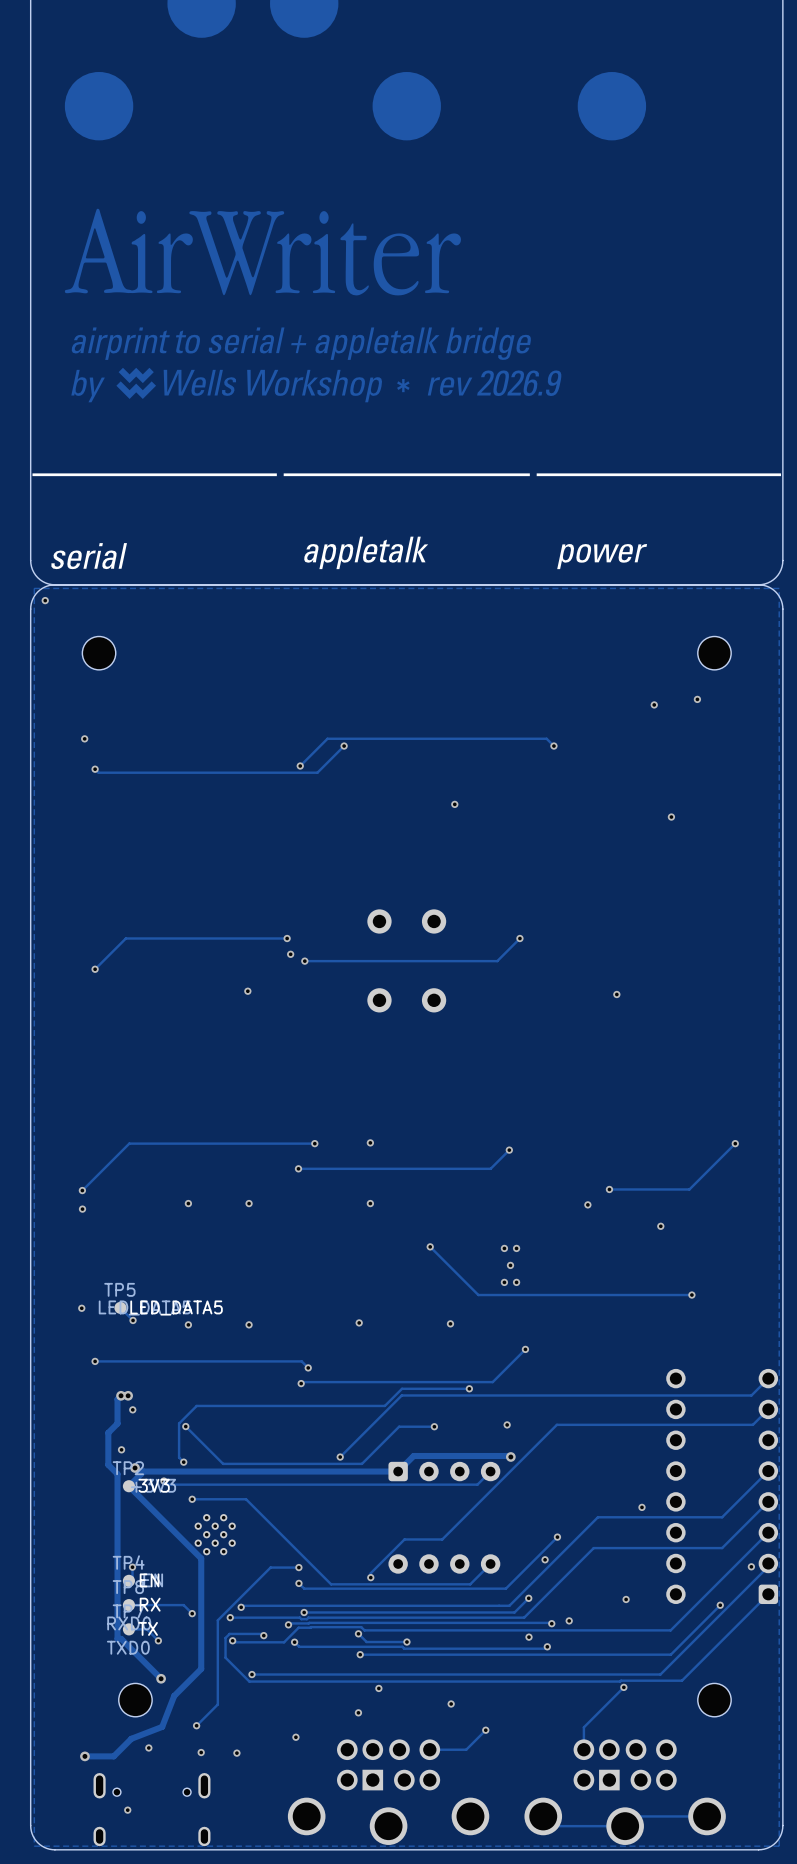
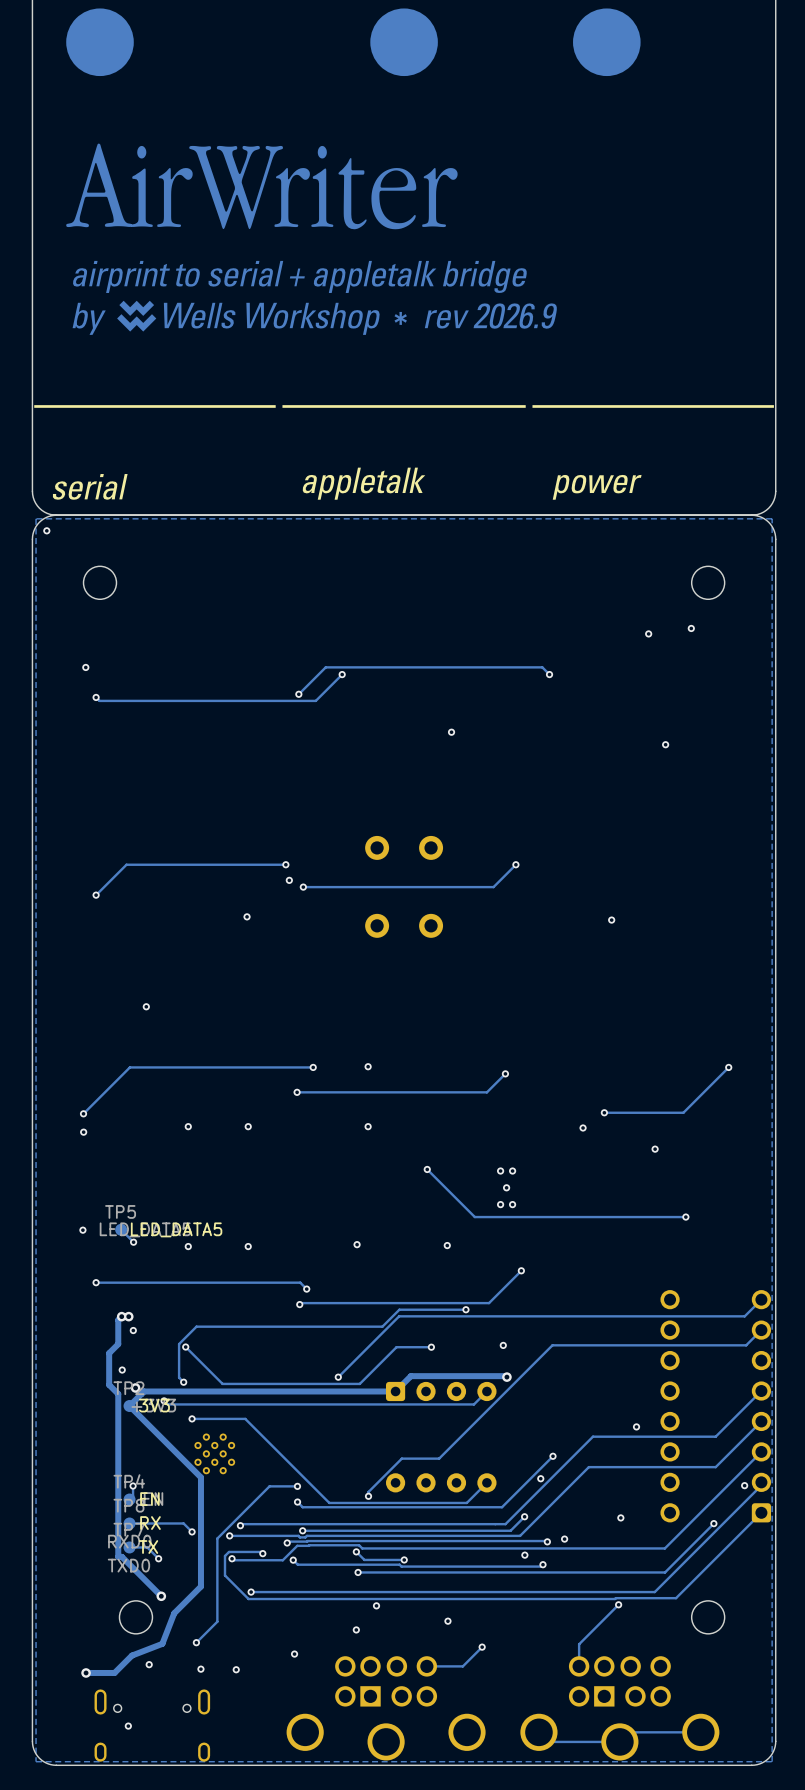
via: none -> (146, 1006)

